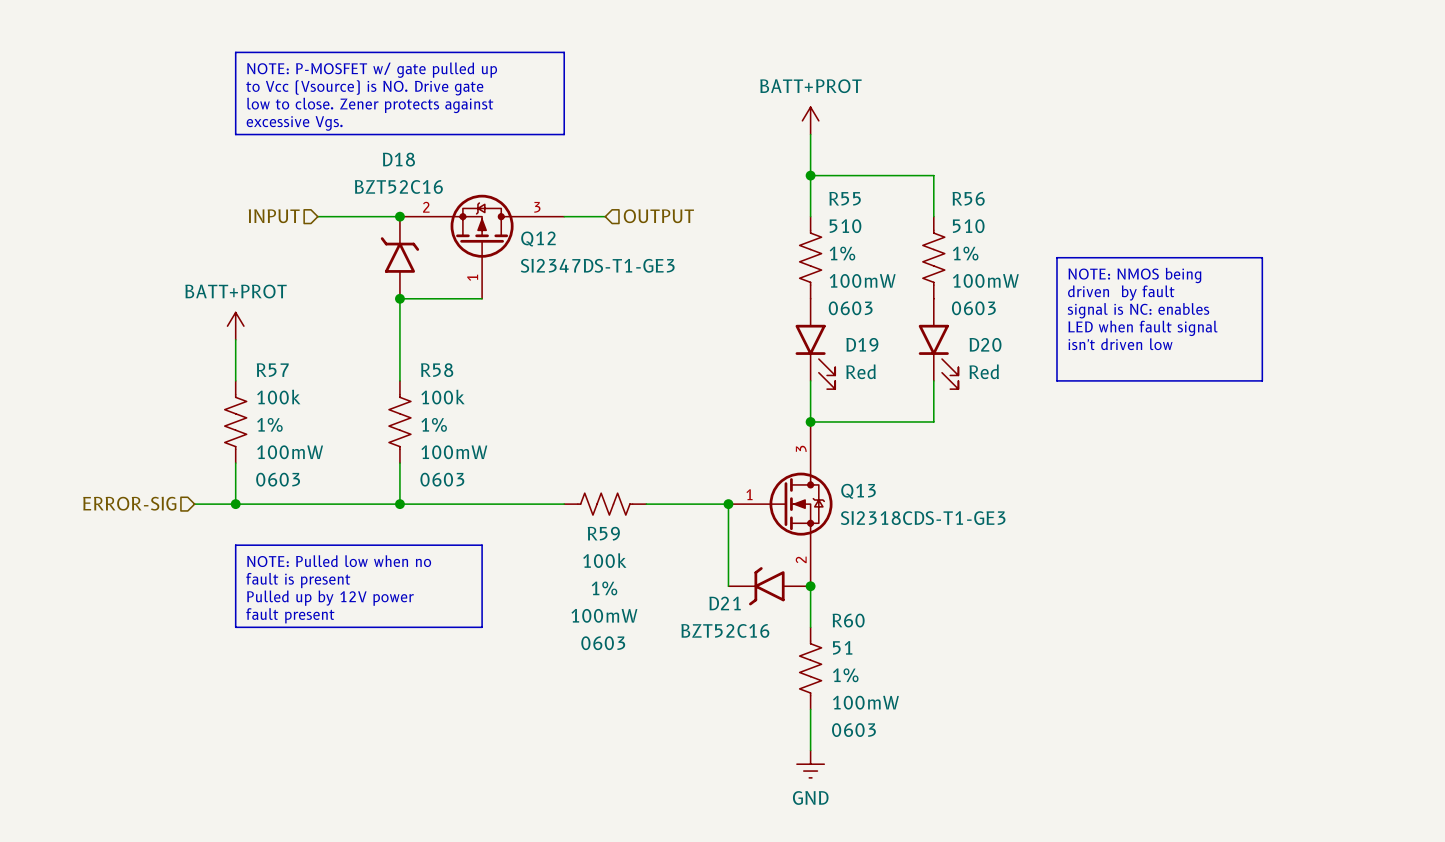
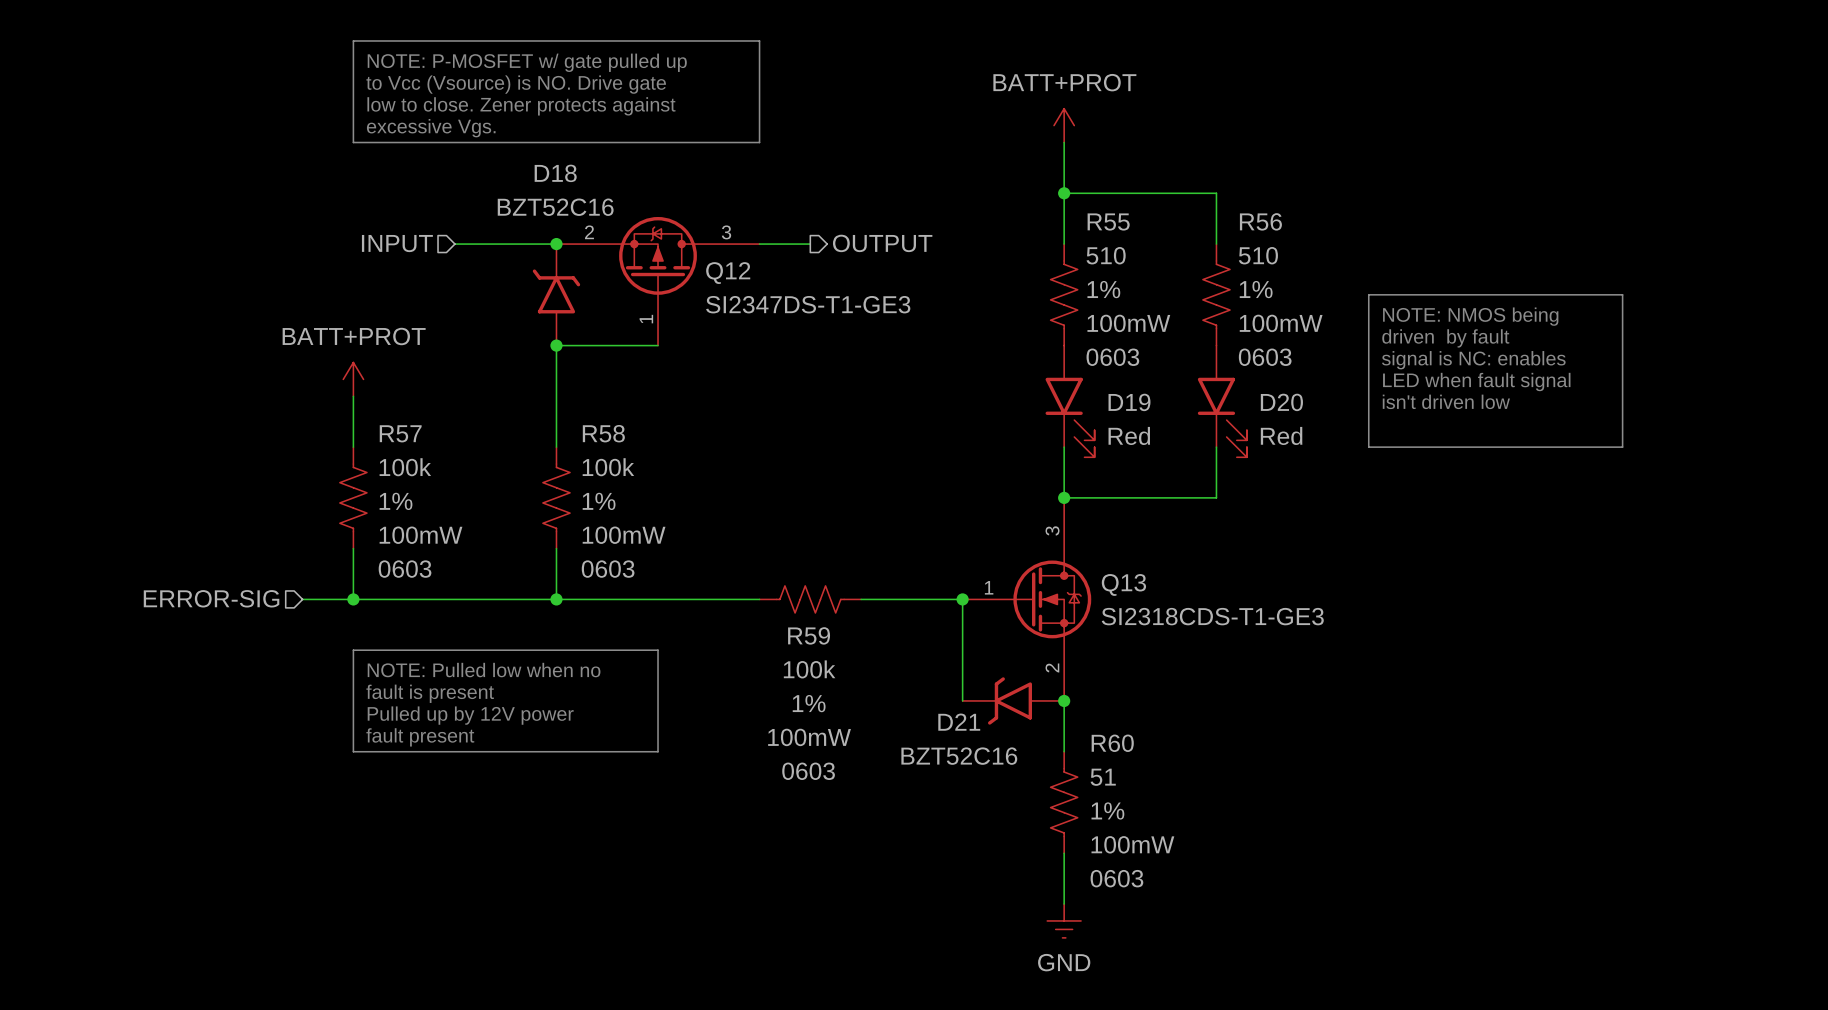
hierarchical label shape: input (658, 216) -> output (882, 243)

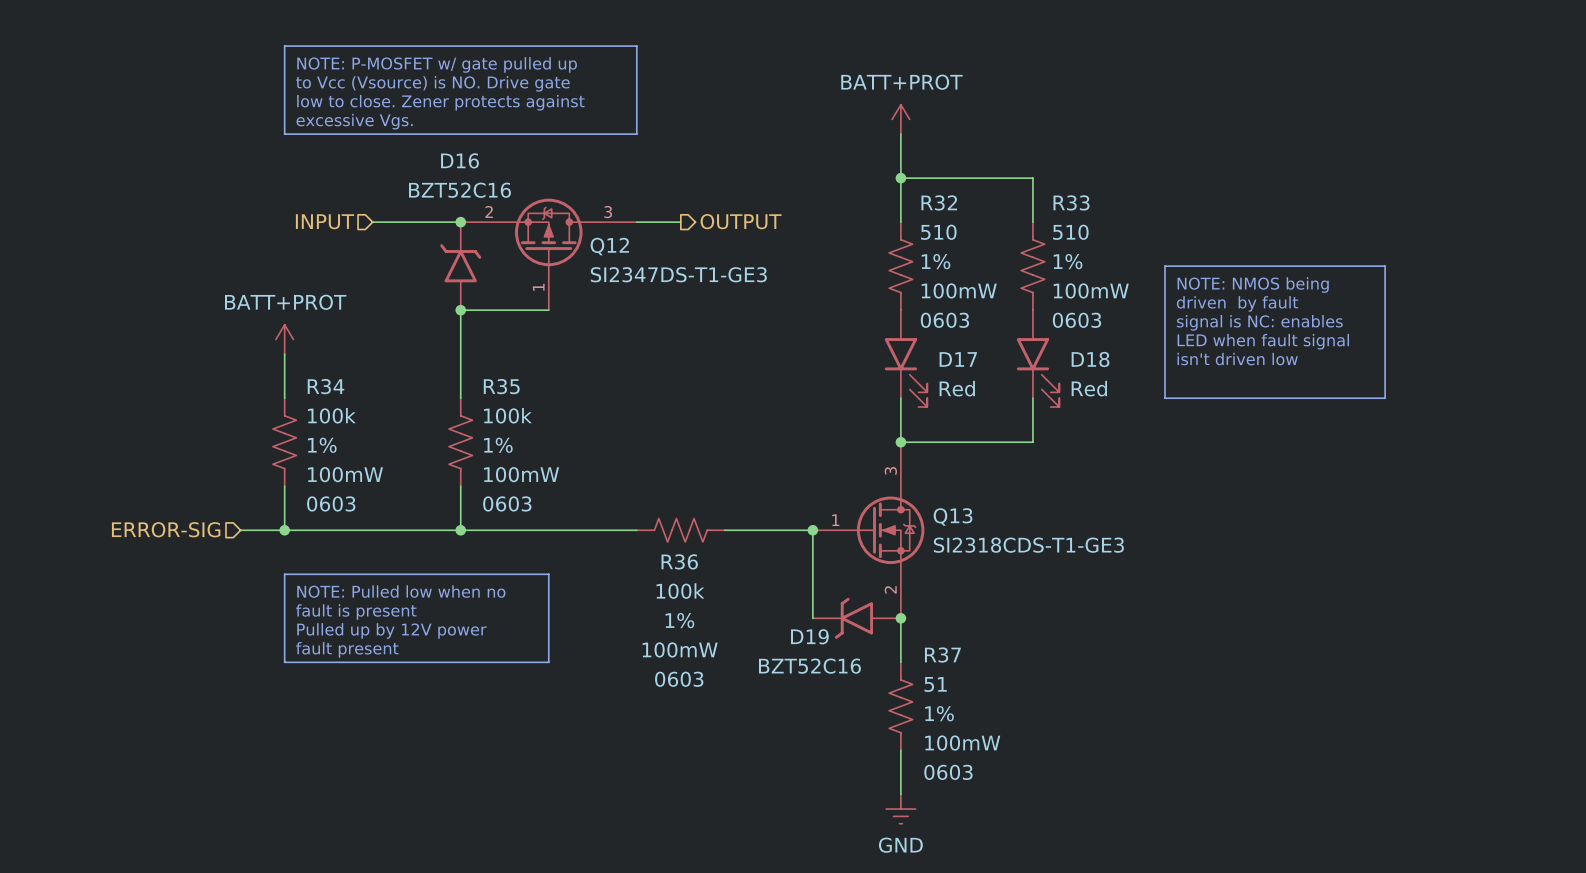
D18 name: D18 (555, 173) -> D16 (459, 160)
R56 name: R56 (1260, 221) -> R33 (1071, 202)
R55 name: R55 (1108, 222) -> R32 (939, 202)
D19 name: D19 (1129, 402) -> D17 (958, 359)
D20 name: D20 (1281, 402) -> D18 (1090, 359)
R57 name: R57 (400, 433) -> R34 (325, 386)
R58 name: R58 (603, 433) -> R35 (501, 386)
R59 name: R59 (809, 635) -> R36 (679, 561)
D21 name: D21 (959, 722) -> D19 (809, 636)
R60 name: R60 (1112, 743) -> R37 (942, 655)

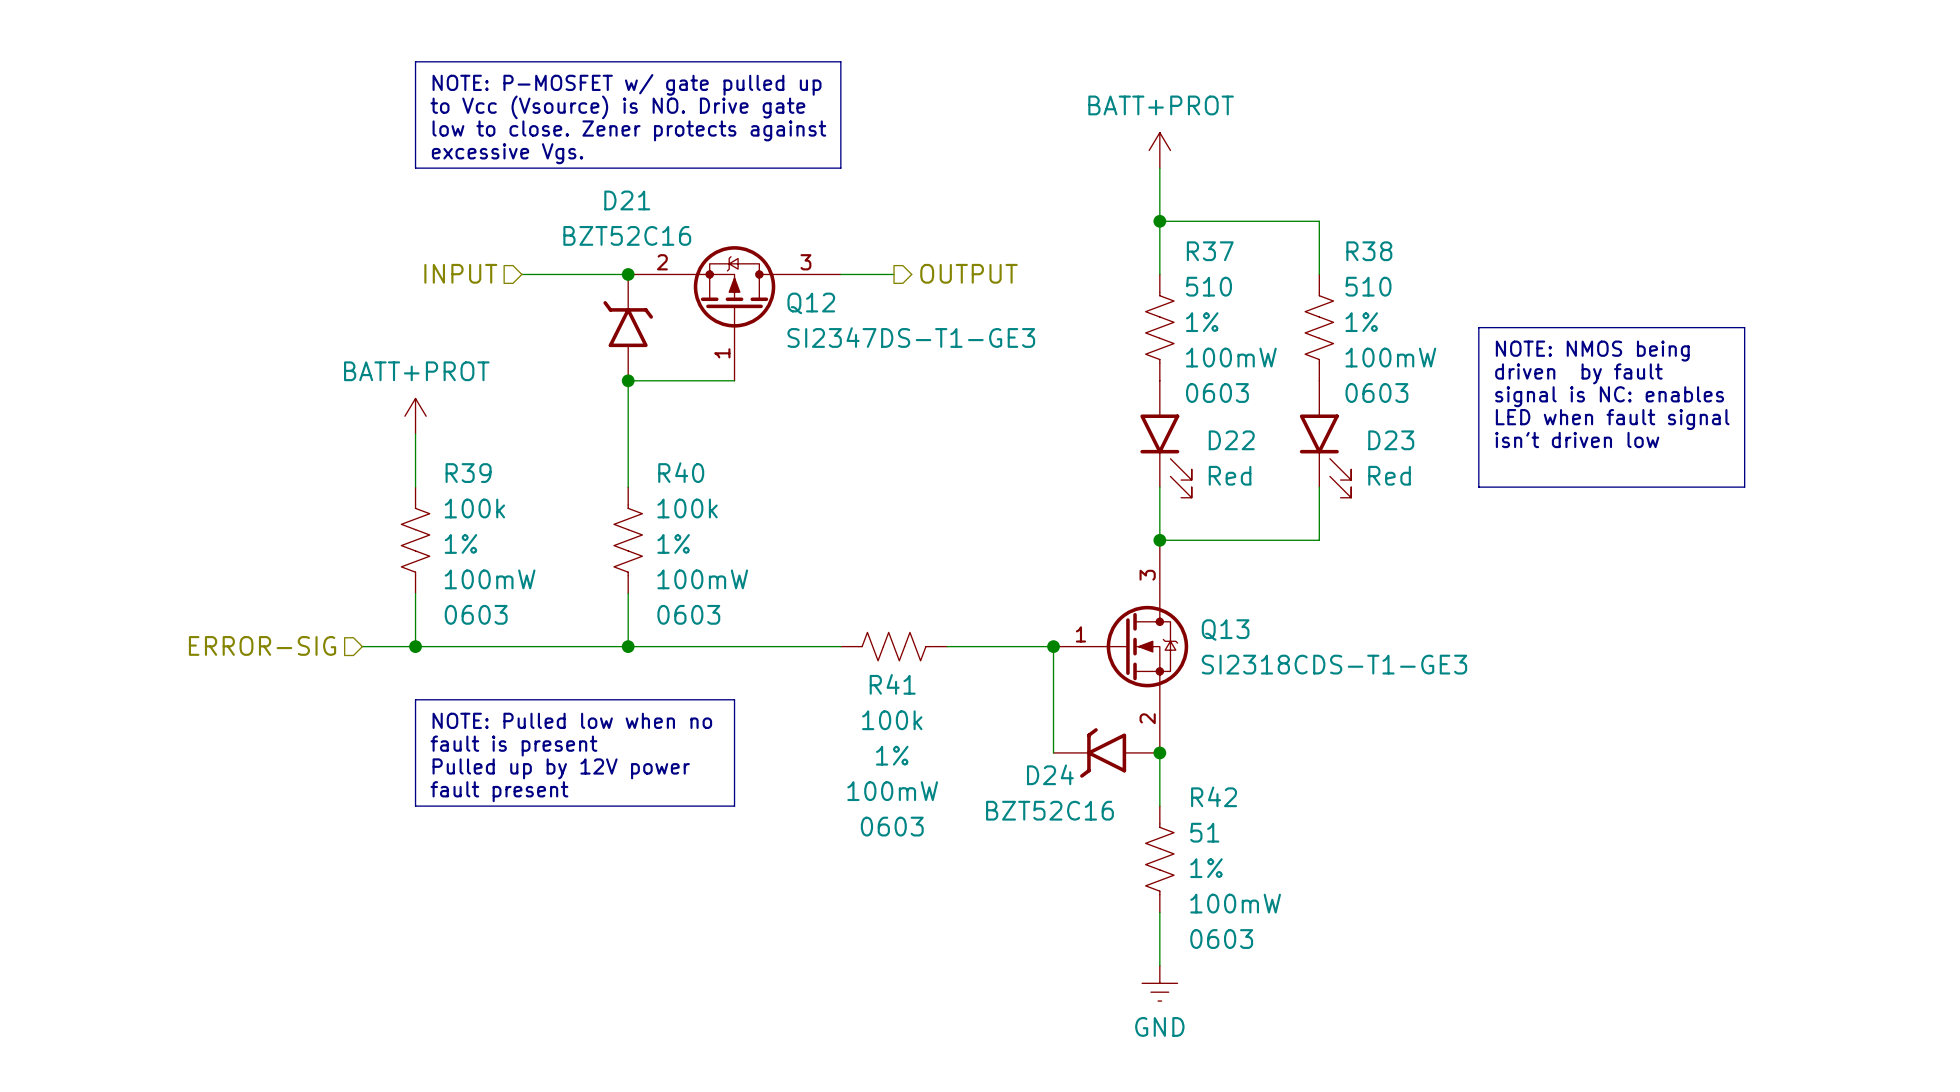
D16 name: D16 (459, 160) -> D21 (627, 200)
R32 name: R32 (939, 202) -> R37 (1210, 251)
R33 name: R33 (1071, 202) -> R38 (1369, 251)
D17 name: D17 (958, 359) -> D22 (1231, 440)
D18 name: D18 (1090, 359) -> D23 (1391, 440)
R34 name: R34 (325, 386) -> R39 (468, 473)
R35 name: R35 (501, 386) -> R40 (681, 472)
R36 name: R36 (679, 561) -> R41 (892, 684)
D19 name: D19 (809, 636) -> D24 (1050, 774)
R37 name: R37 (942, 655) -> R42 (1214, 796)

